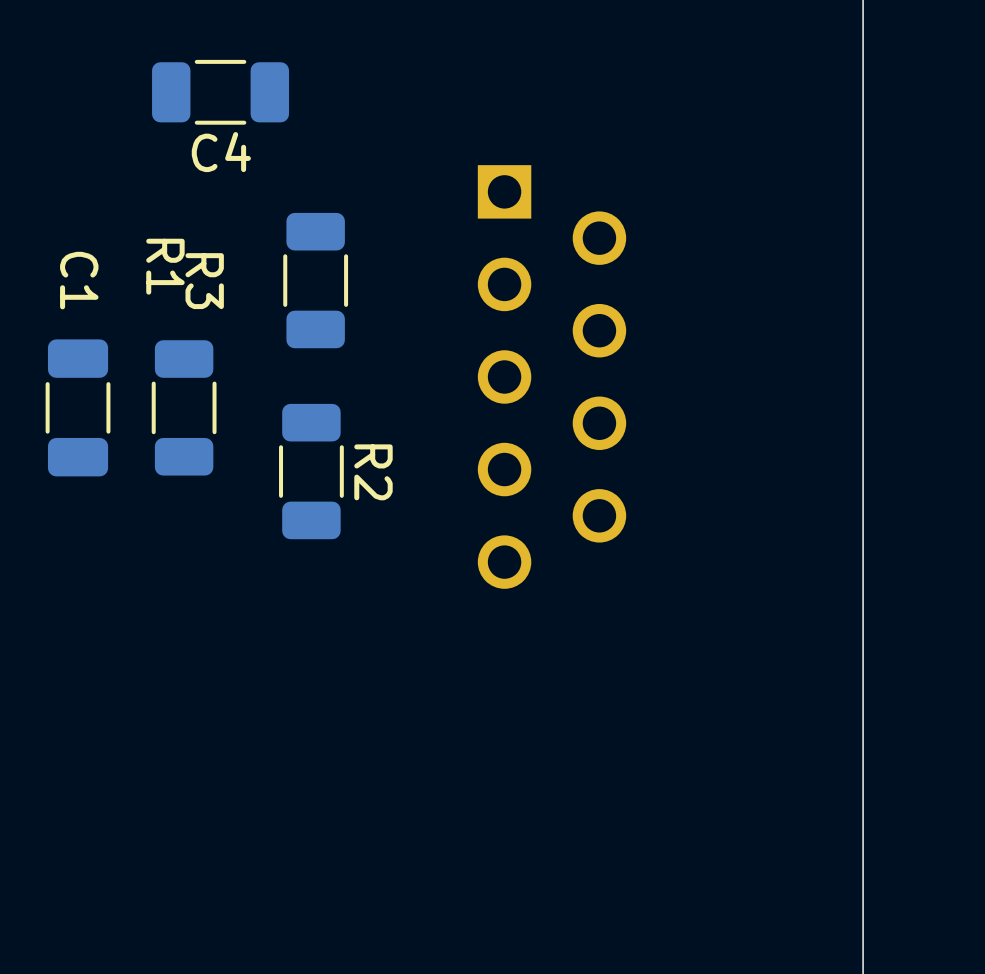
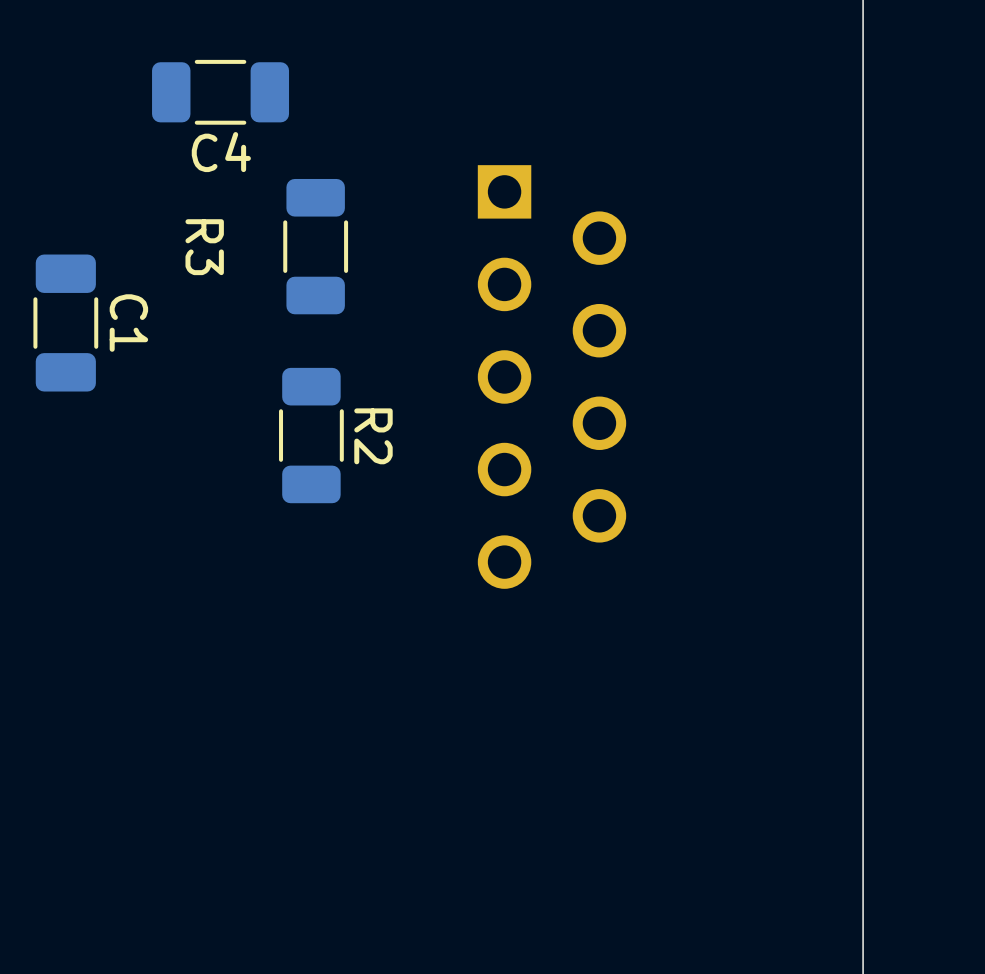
C1 name position: C1 (79, 280) -> C1 (128, 323)
R3 position: (315, 280) -> (315, 246)
C1 position: (78, 407) -> (65, 323)
R1: (184, 407) -> none
R2 position: (311, 471) -> (311, 435)

